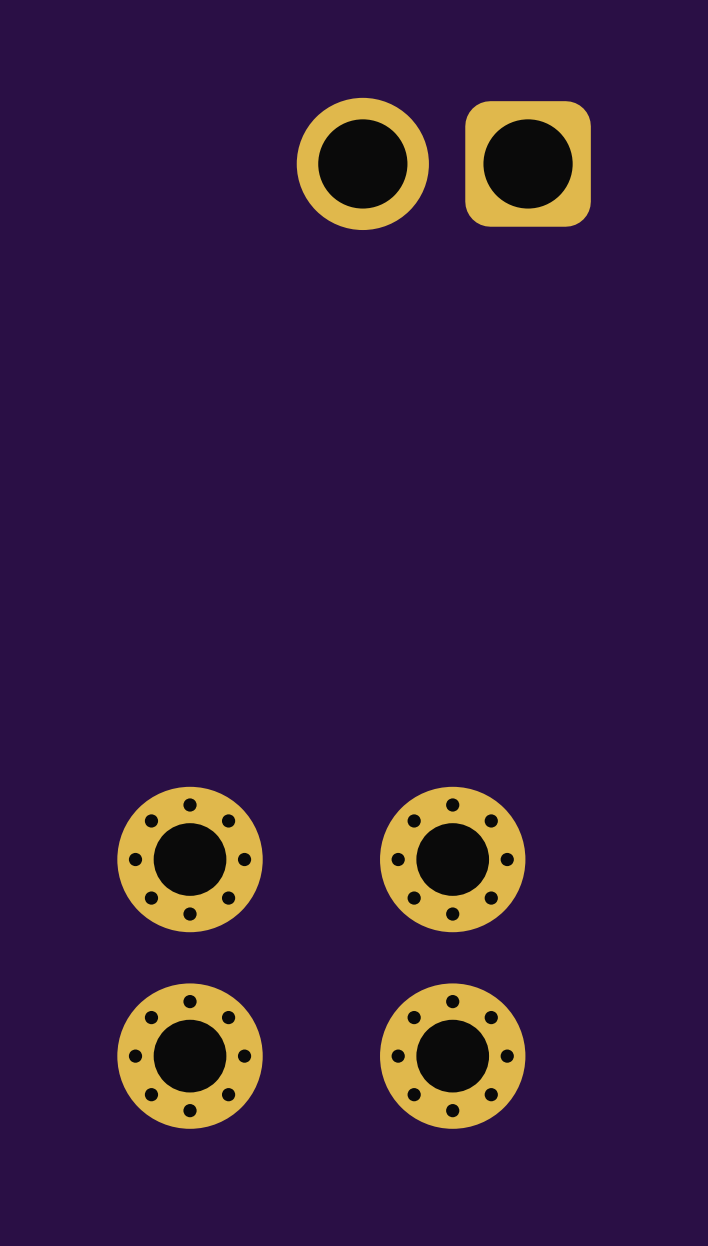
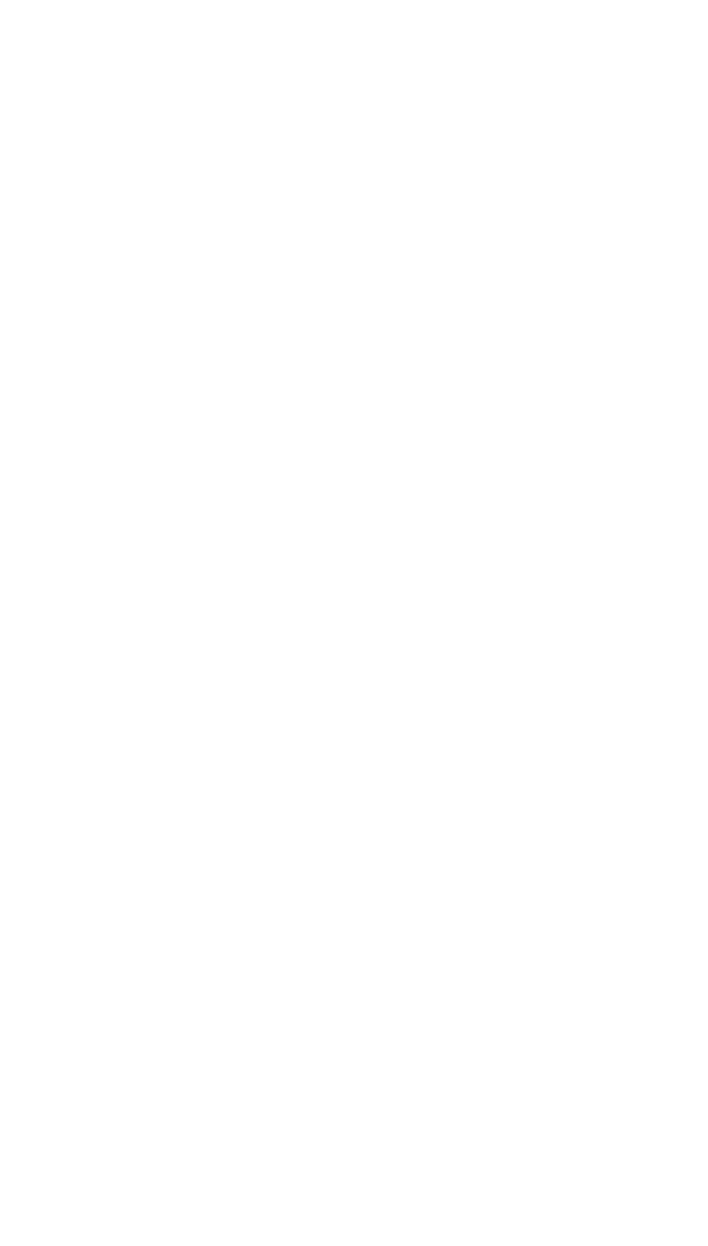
part: (443, 163) -> none
part: (190, 859) -> none
part: (452, 859) -> none
part: (190, 1056) -> none
part: (452, 1056) -> none

